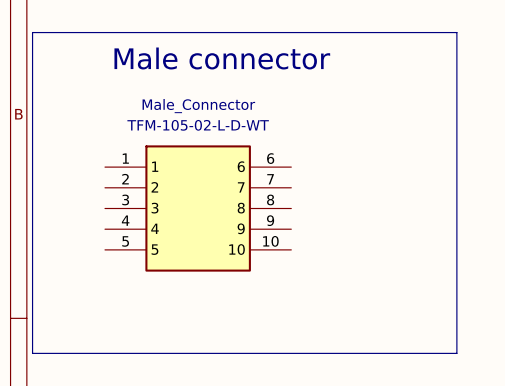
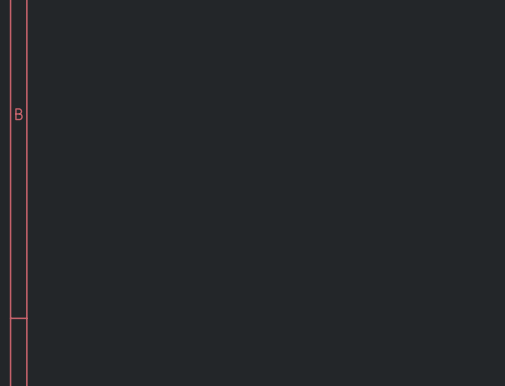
line: (32, 32) (456, 32) (456, 353) (32, 353) (32, 32) -> none
text: Male connector (222, 58) -> none
Male_Connector: TFM-105-02-L-D-WT (198, 208) -> none

